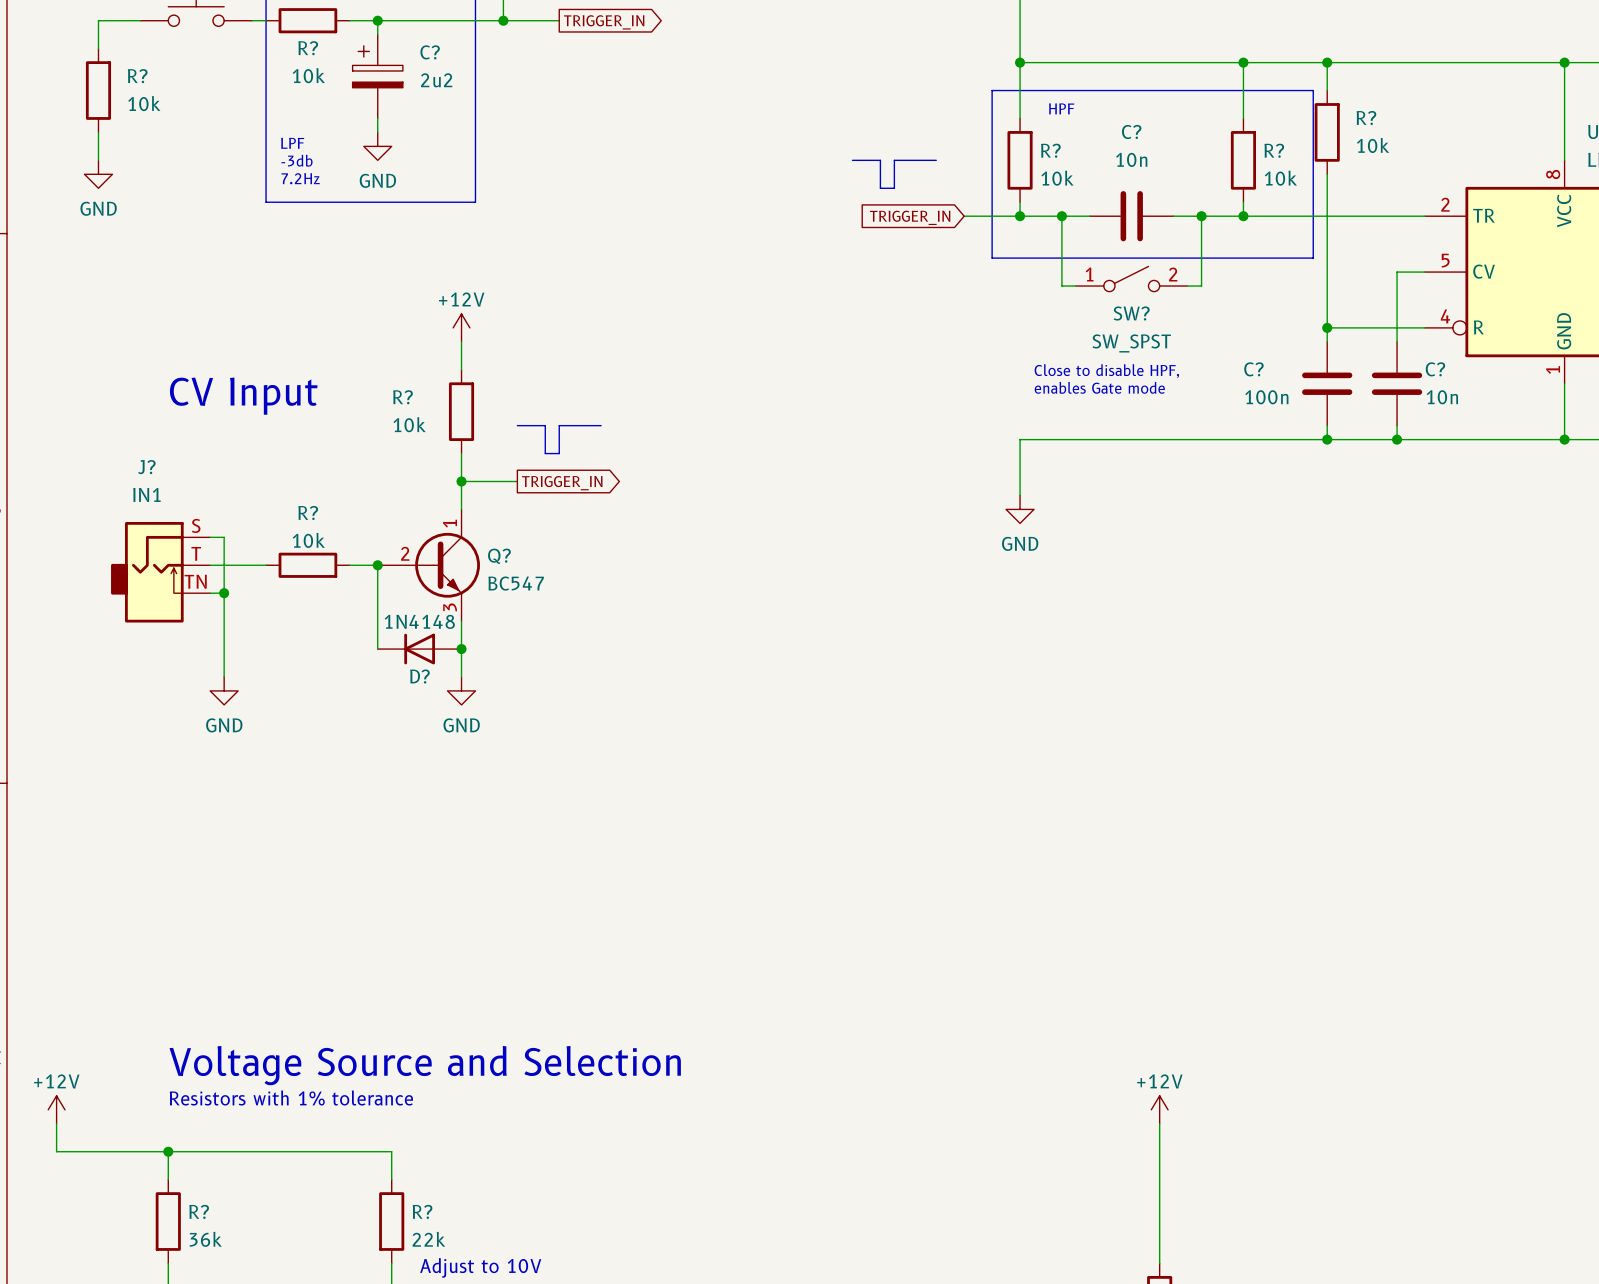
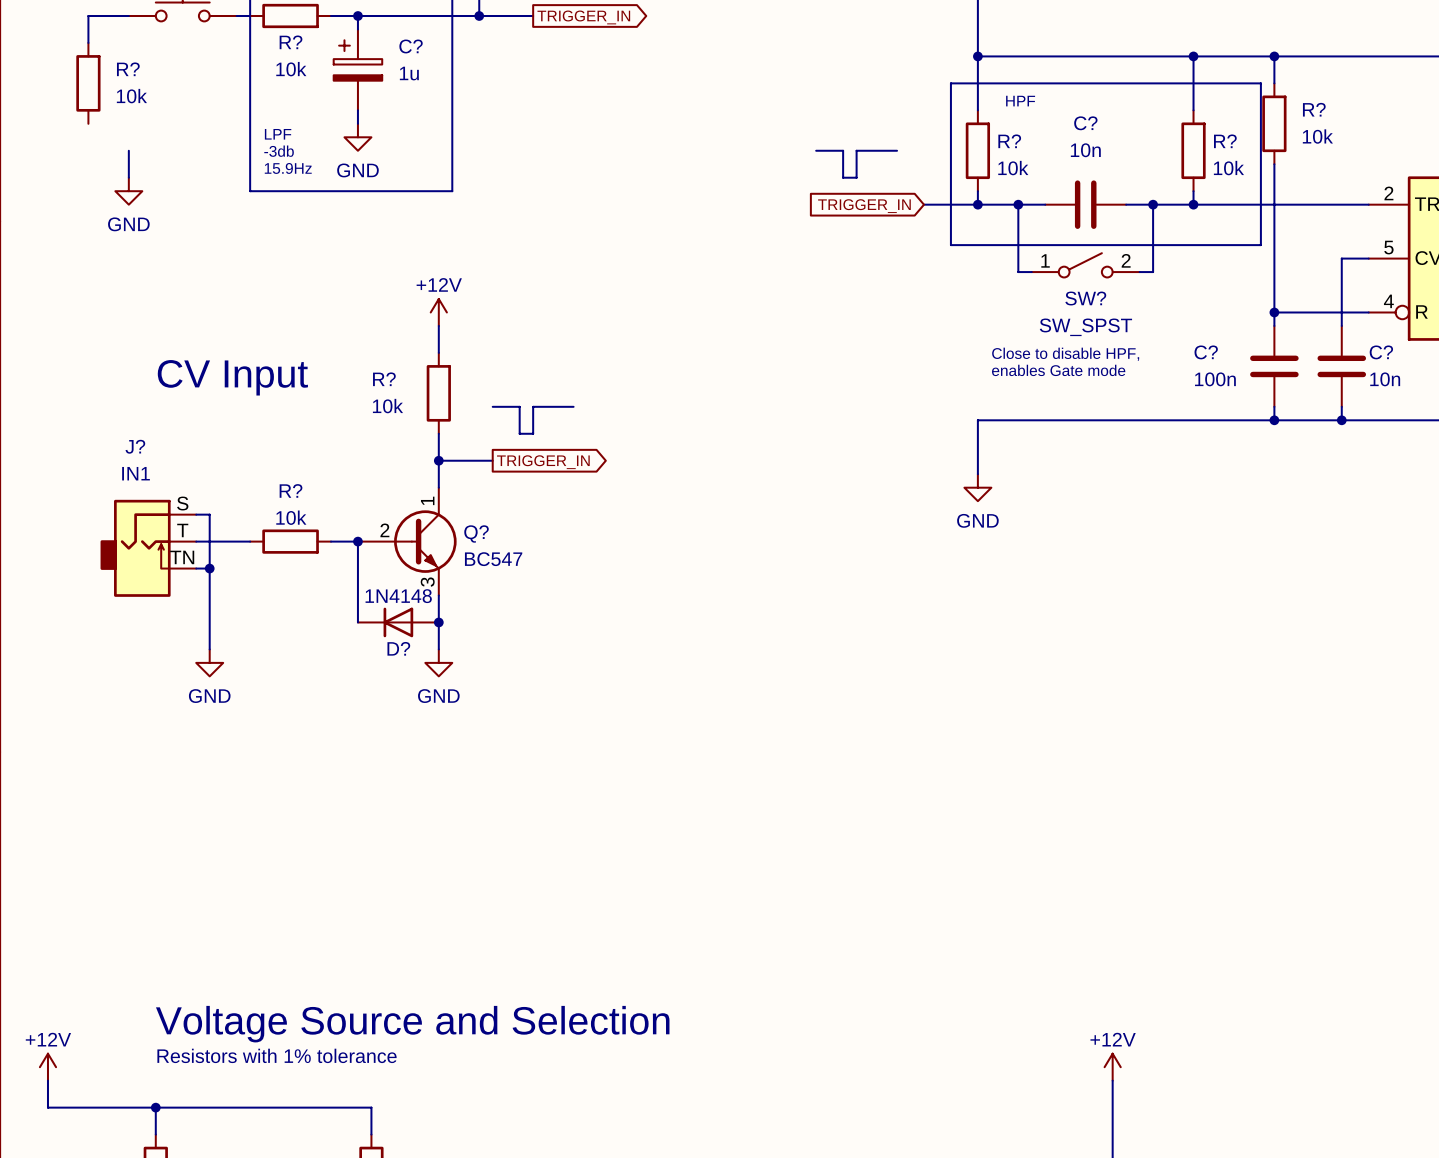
C? value: 2u2 (436, 80) -> 1u (409, 73)
wire: (98, 132) (98, 160) -> (128, 150) (128, 177)
power symbol position: GND (98, 174) -> GND (128, 191)
text: 7.2Hz (300, 178) -> 15.9Hz (288, 168)

